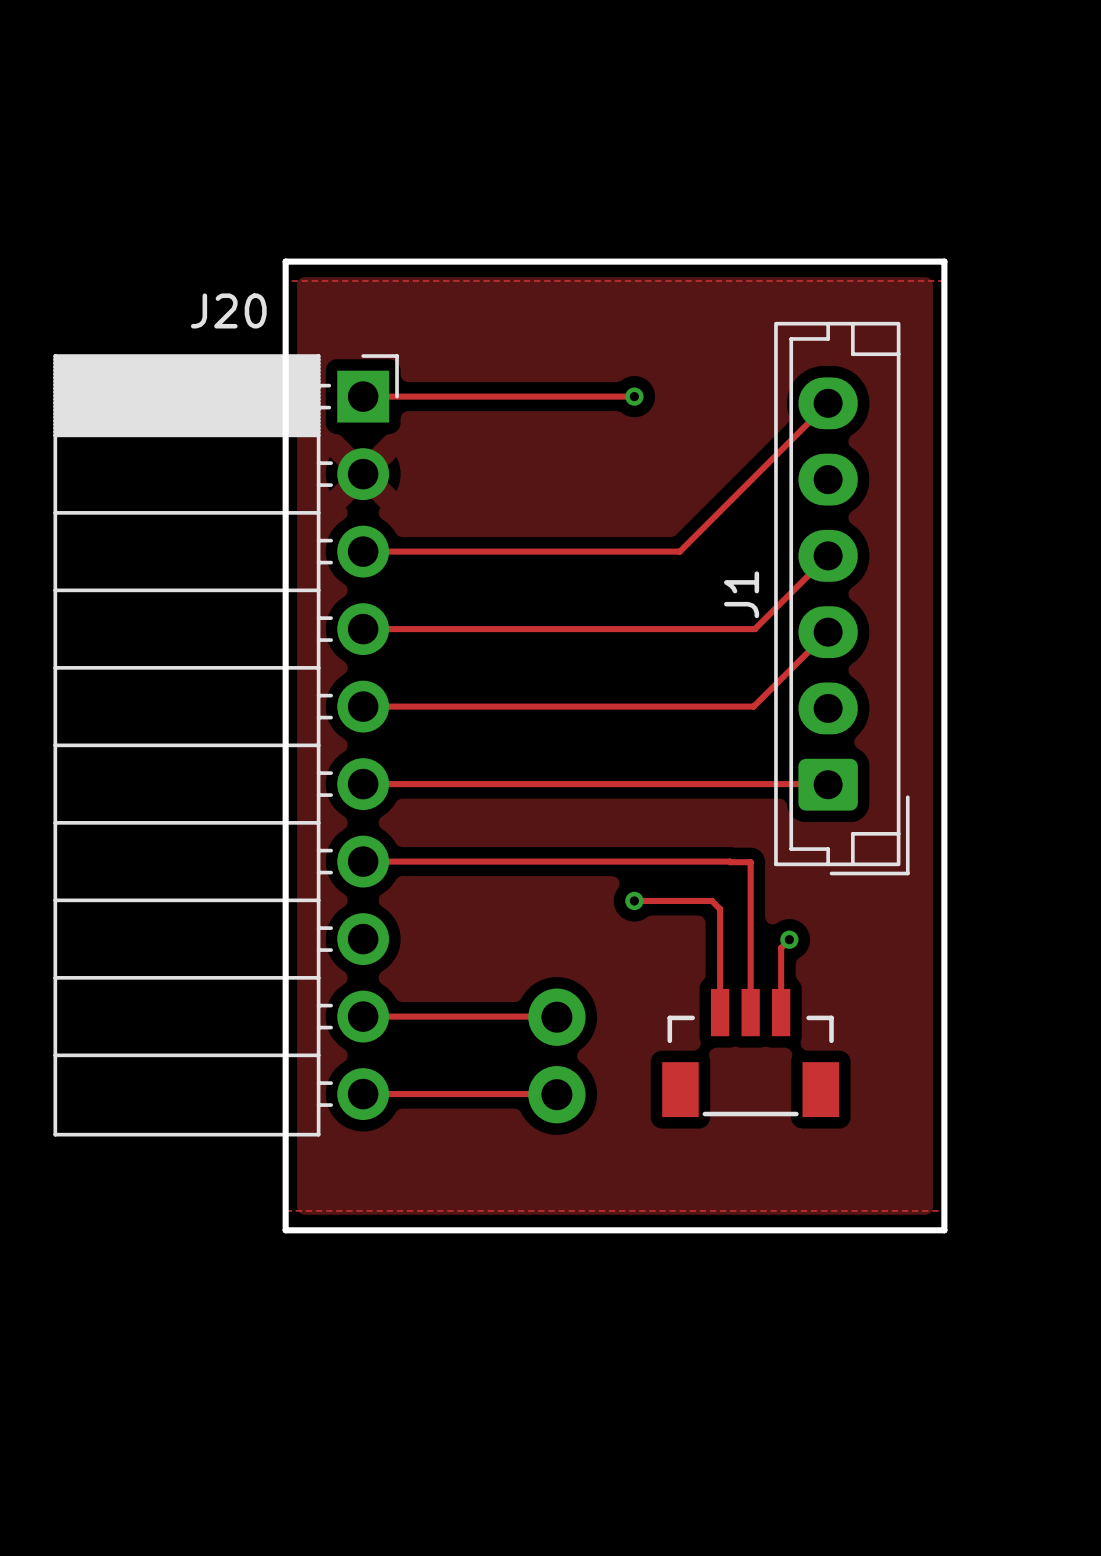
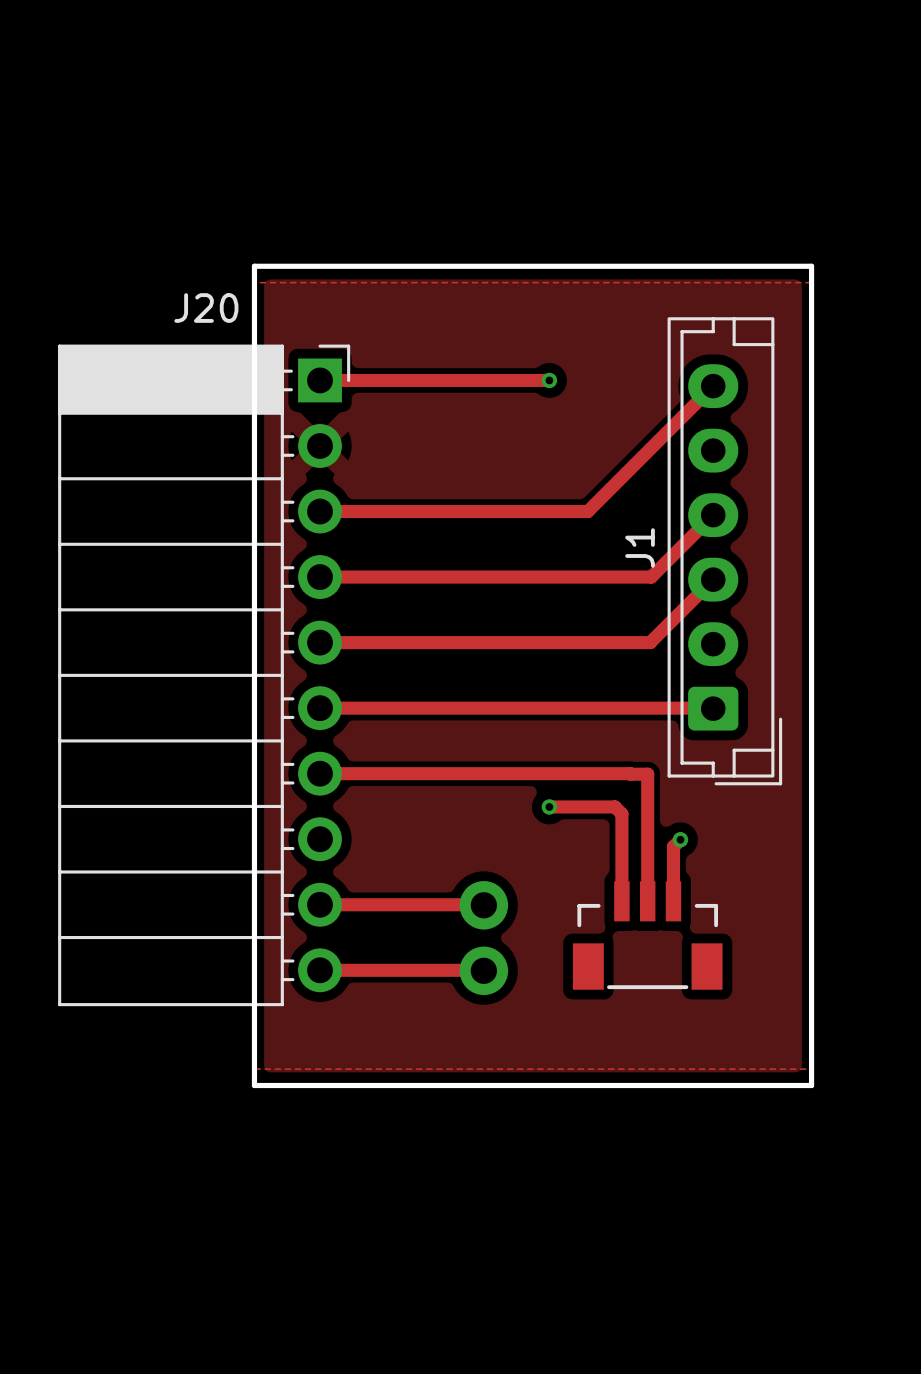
track width: thin (363, 396) (634, 396) -> thick (320, 380) (549, 380)
track width: thin (828, 403) (679, 551) (363, 551) -> thick (713, 386) (587, 511) (320, 511)
track width: thin (828, 555) (754, 629) (363, 629) -> thick (713, 515) (651, 577) (320, 577)
track width: thin (828, 632) (753, 706) (363, 706) -> thick (713, 579) (650, 642) (320, 642)
track width: thin (363, 784) (828, 784) -> thick (320, 708) (713, 708)
track width: thin (363, 861) (750, 862) (750, 1012) -> thick (320, 773) (647, 774) (647, 901)
track width: thin (634, 900) (711, 900) (720, 909) (720, 1012) -> thick (549, 806) (614, 806) (621, 813) (621, 901)
track width: thin (789, 939) (781, 947) (781, 1012) -> thick (680, 839) (673, 846) (673, 901)
track width: thin (363, 1016) (556, 1017) -> thick (320, 904) (483, 905)
track width: thin (363, 1094) (556, 1094) -> thick (320, 970) (483, 970)

